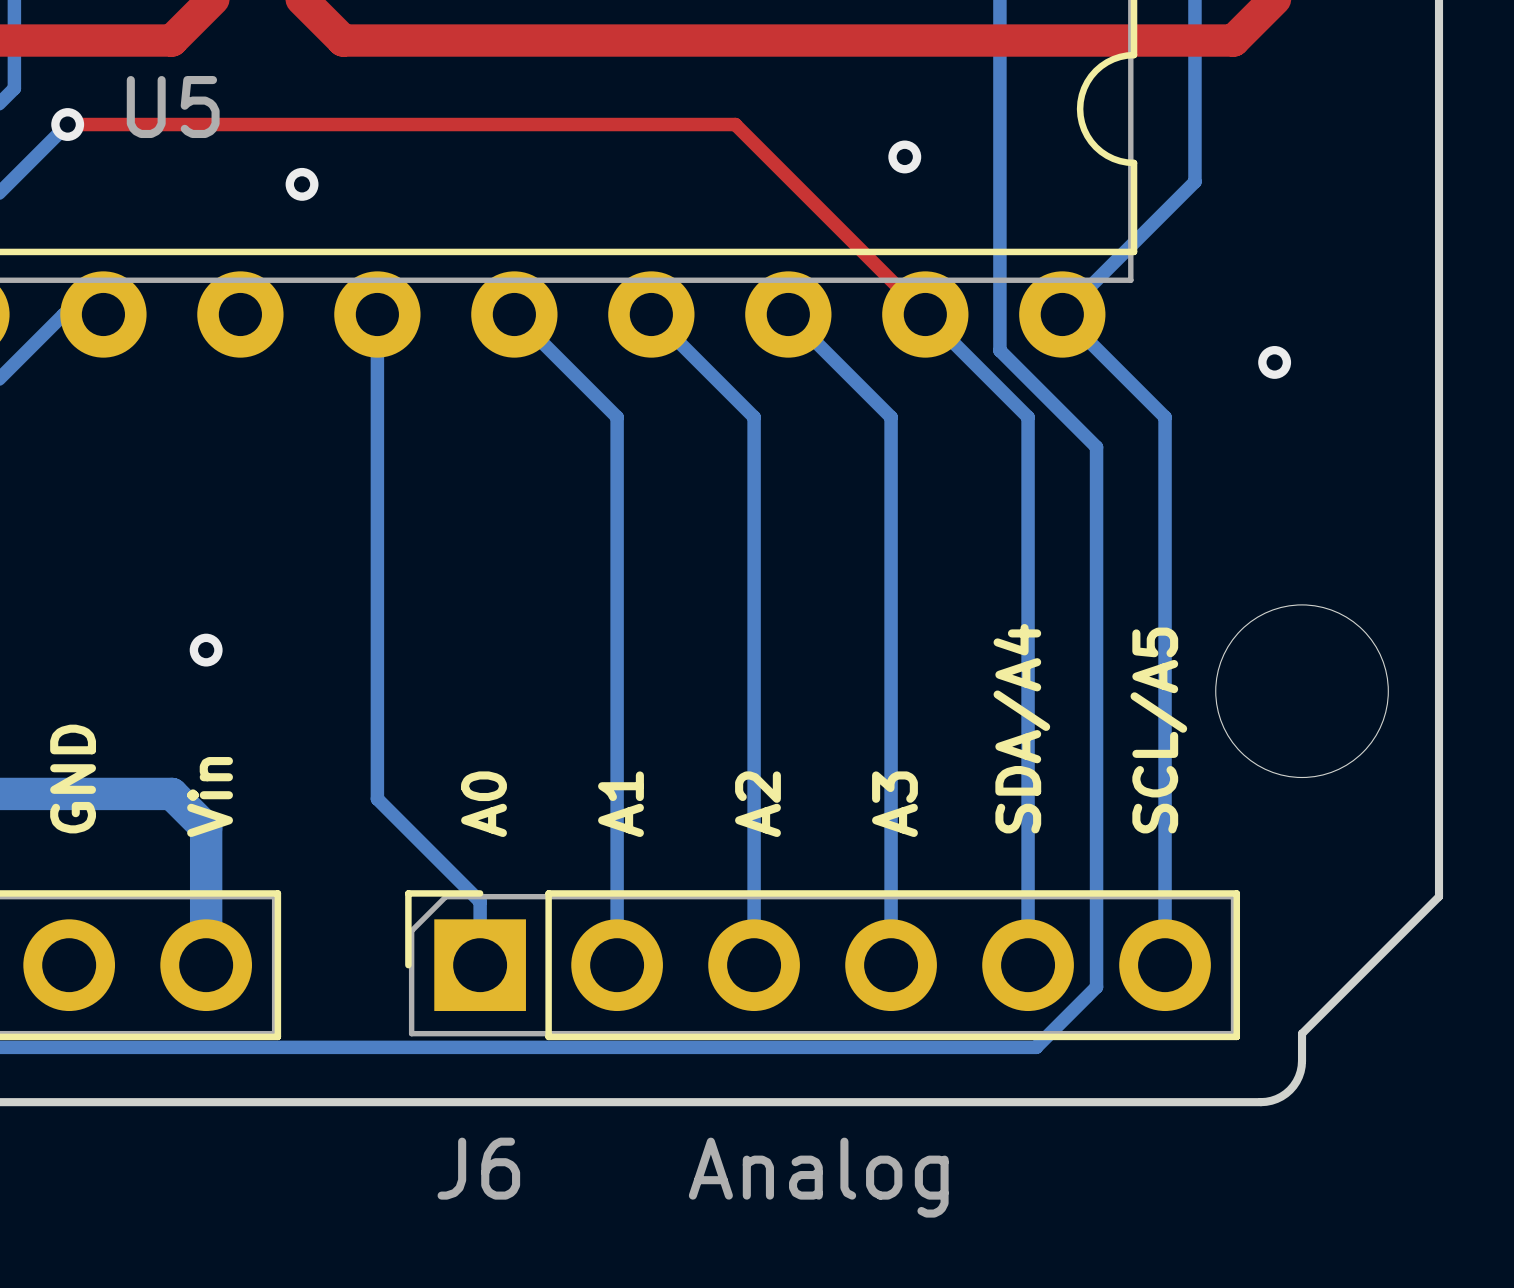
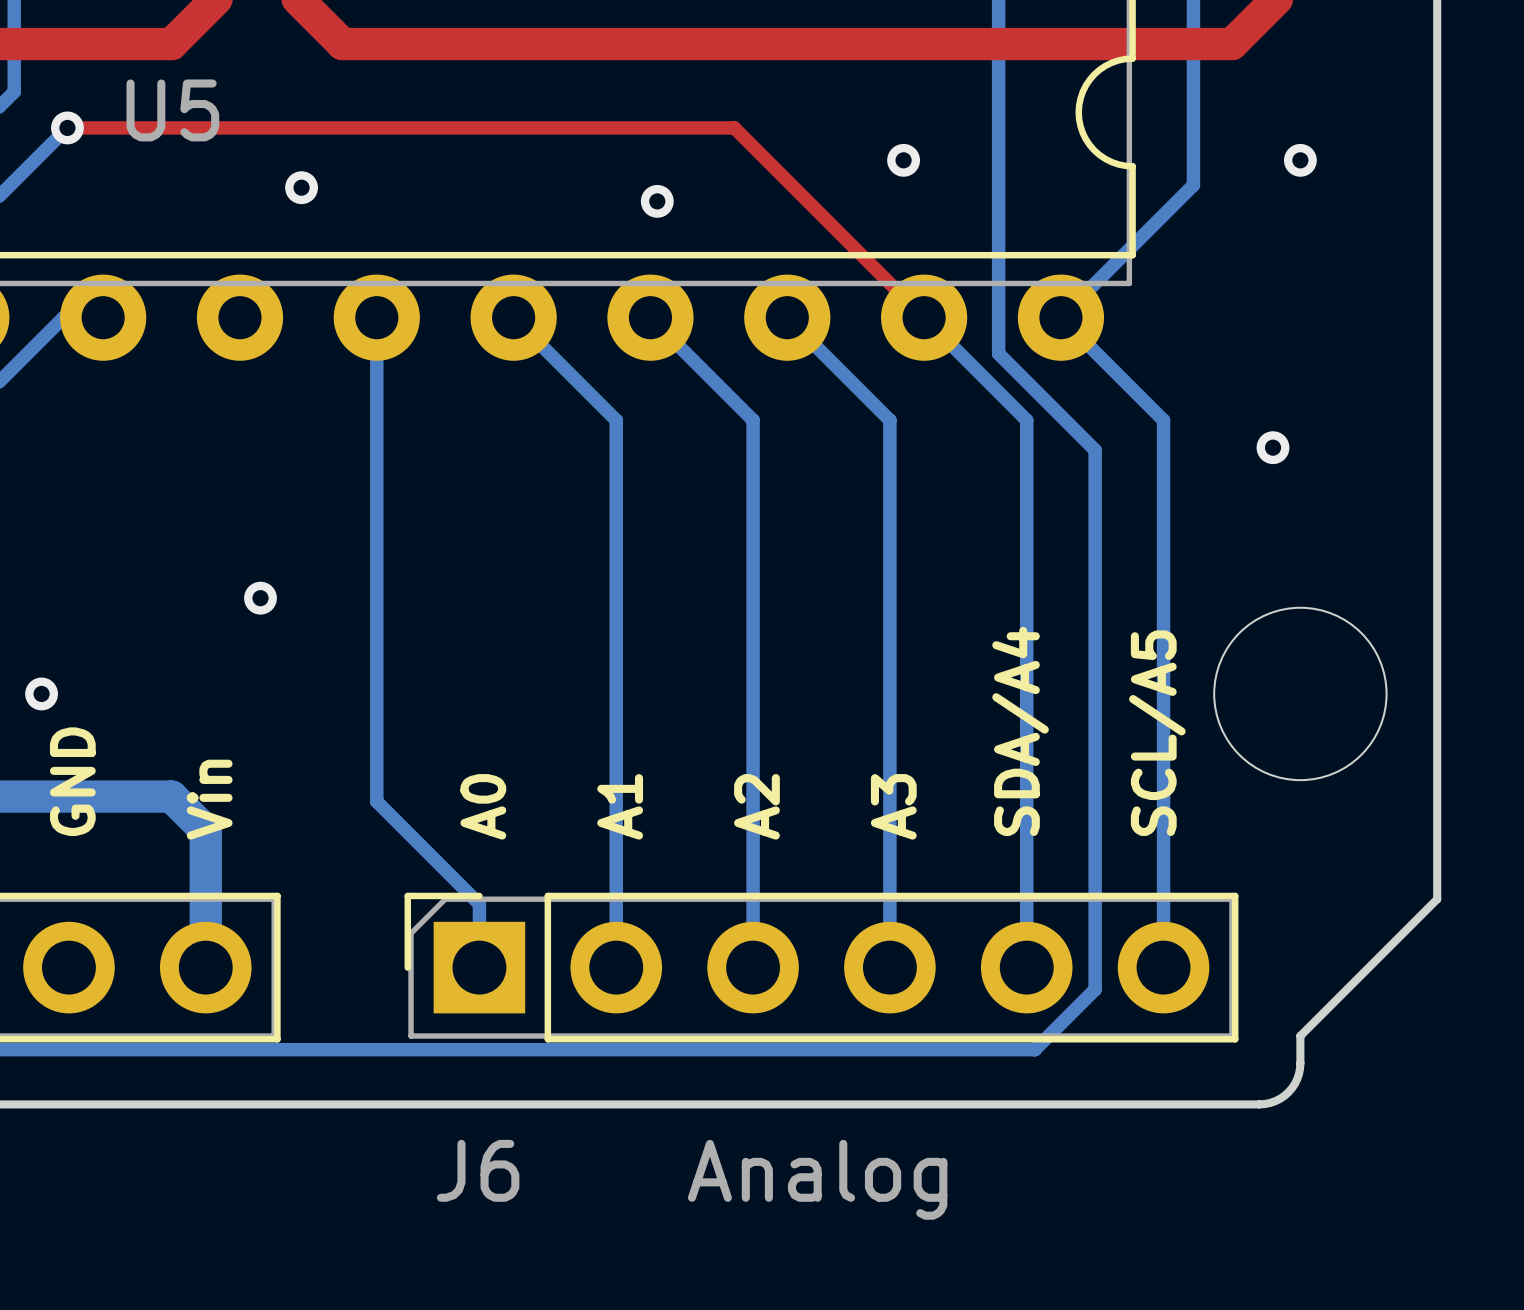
via: none -> (1300, 160)
via: none -> (657, 201)
via position: (1274, 362) -> (1273, 447)
via position: (206, 650) -> (260, 598)
via: none -> (41, 693)

